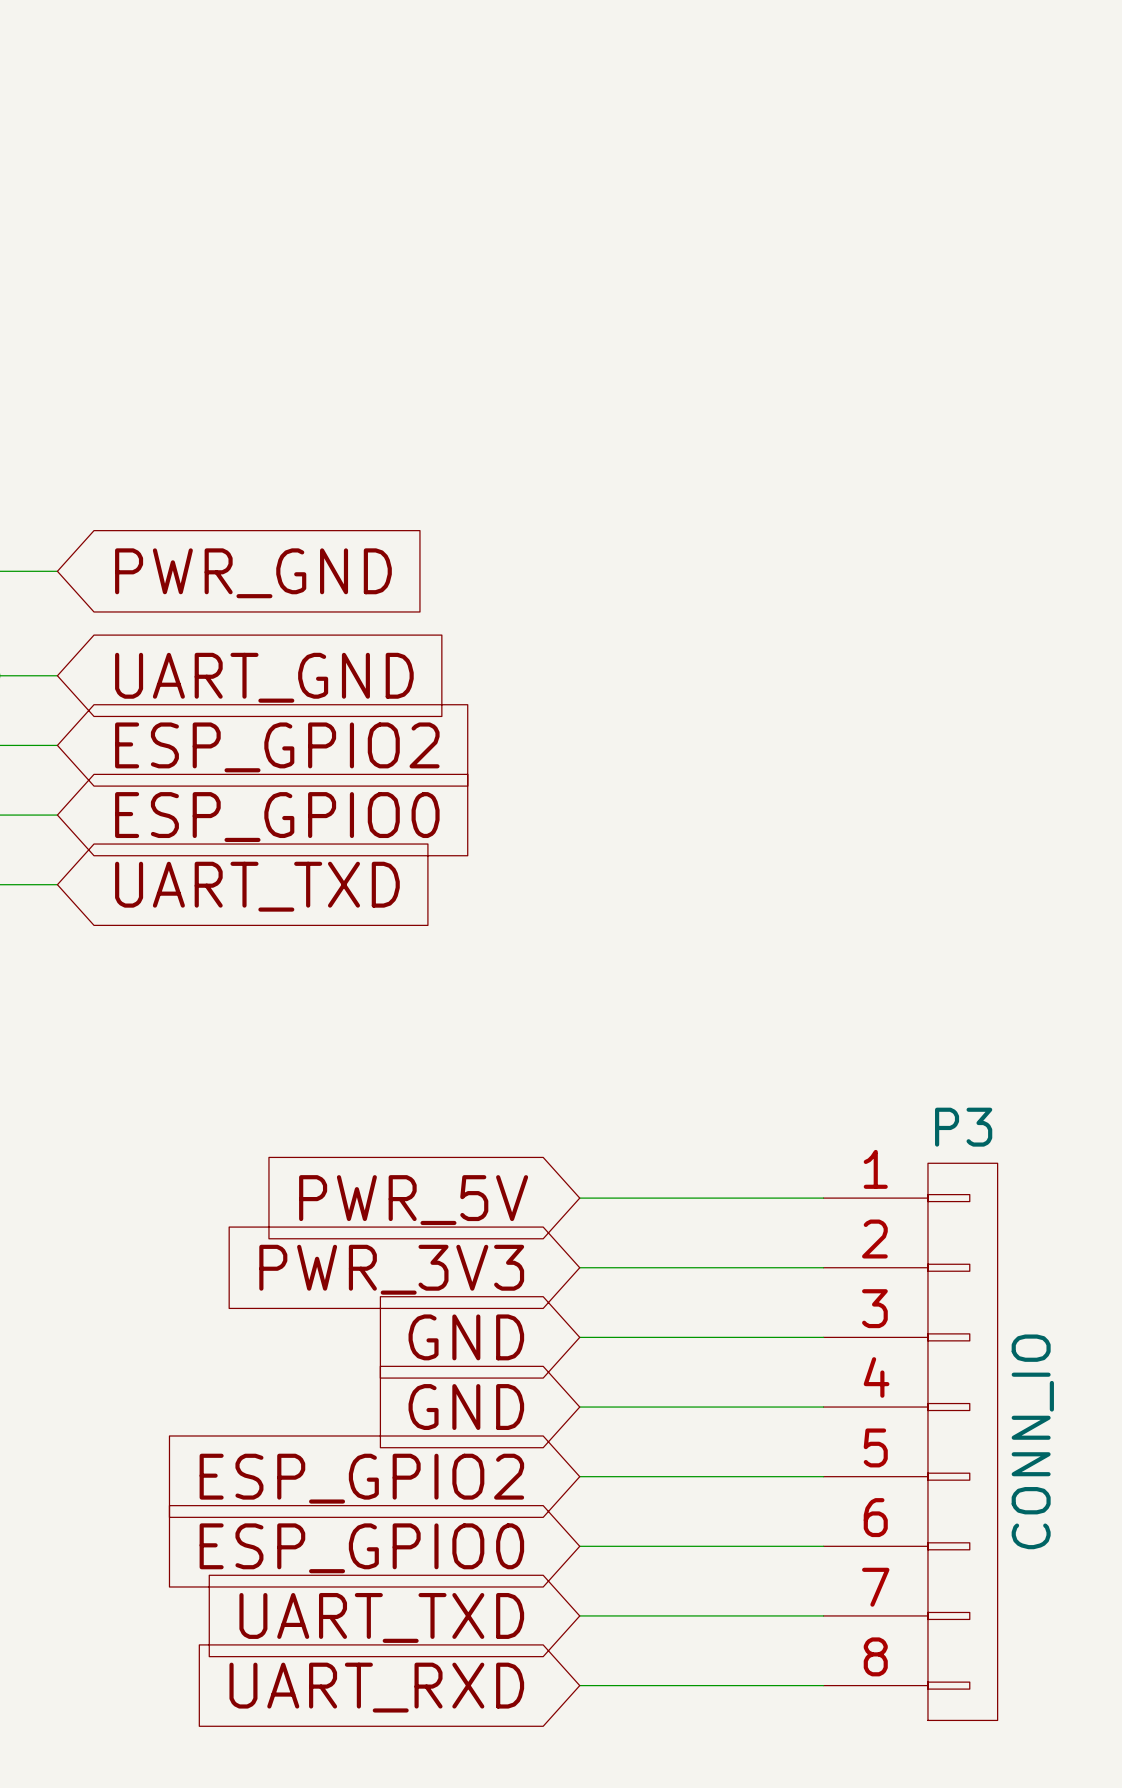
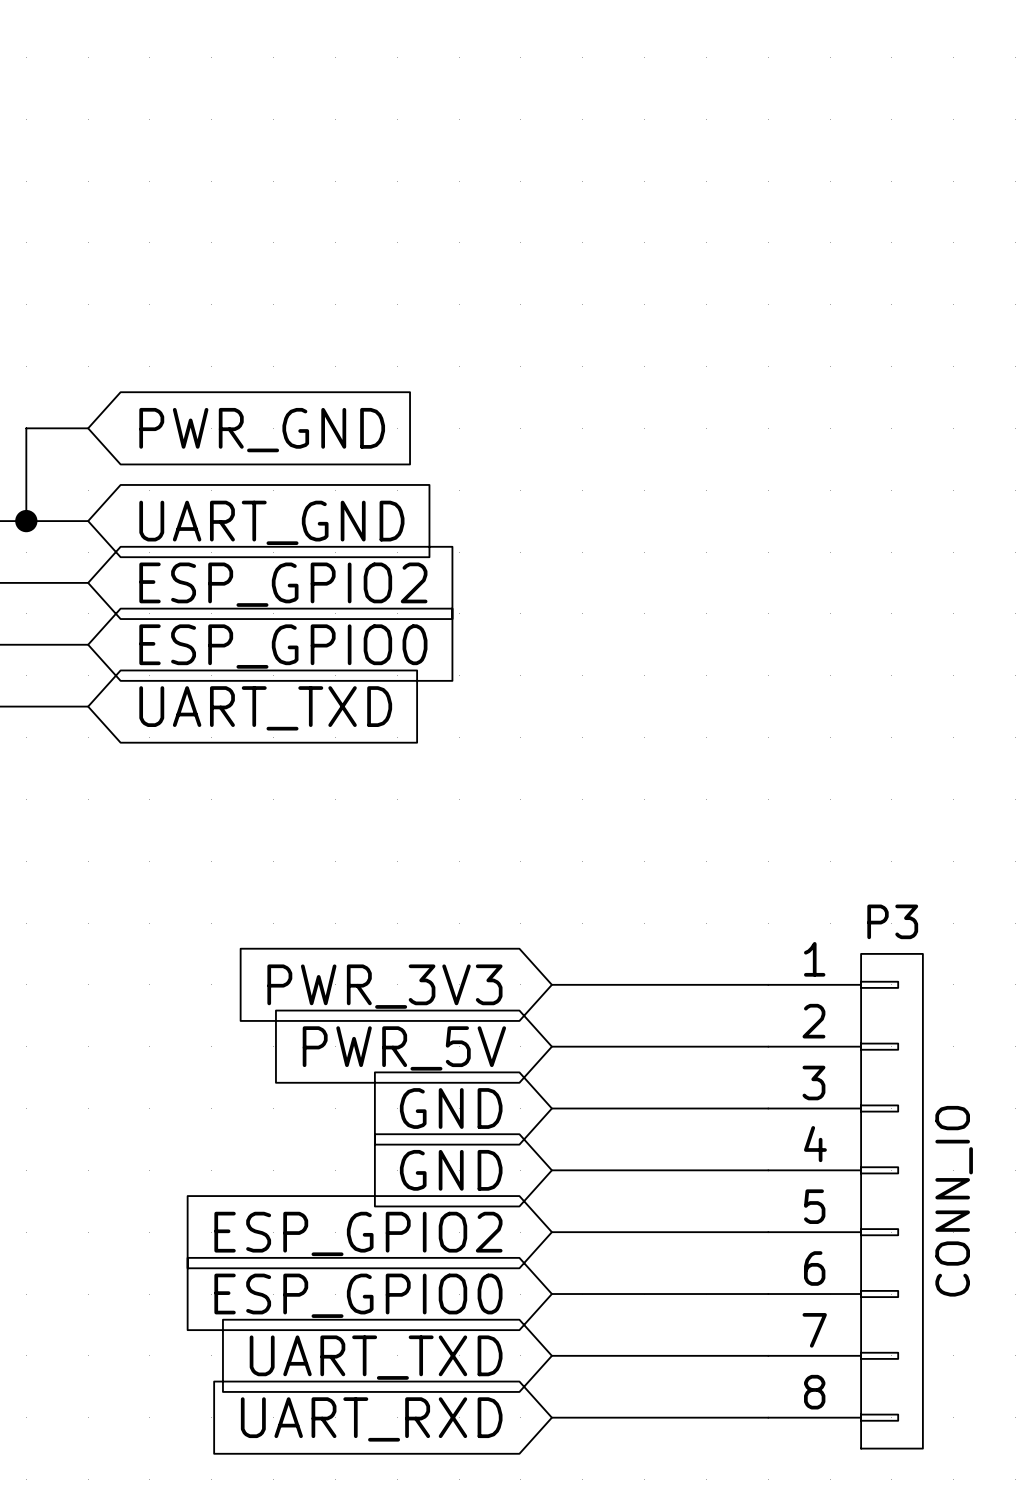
global label: PWR_5V (413, 1200) -> PWR_3V3 (384, 986)
global label: PWR_3V3 (391, 1269) -> PWR_5V (404, 1048)

